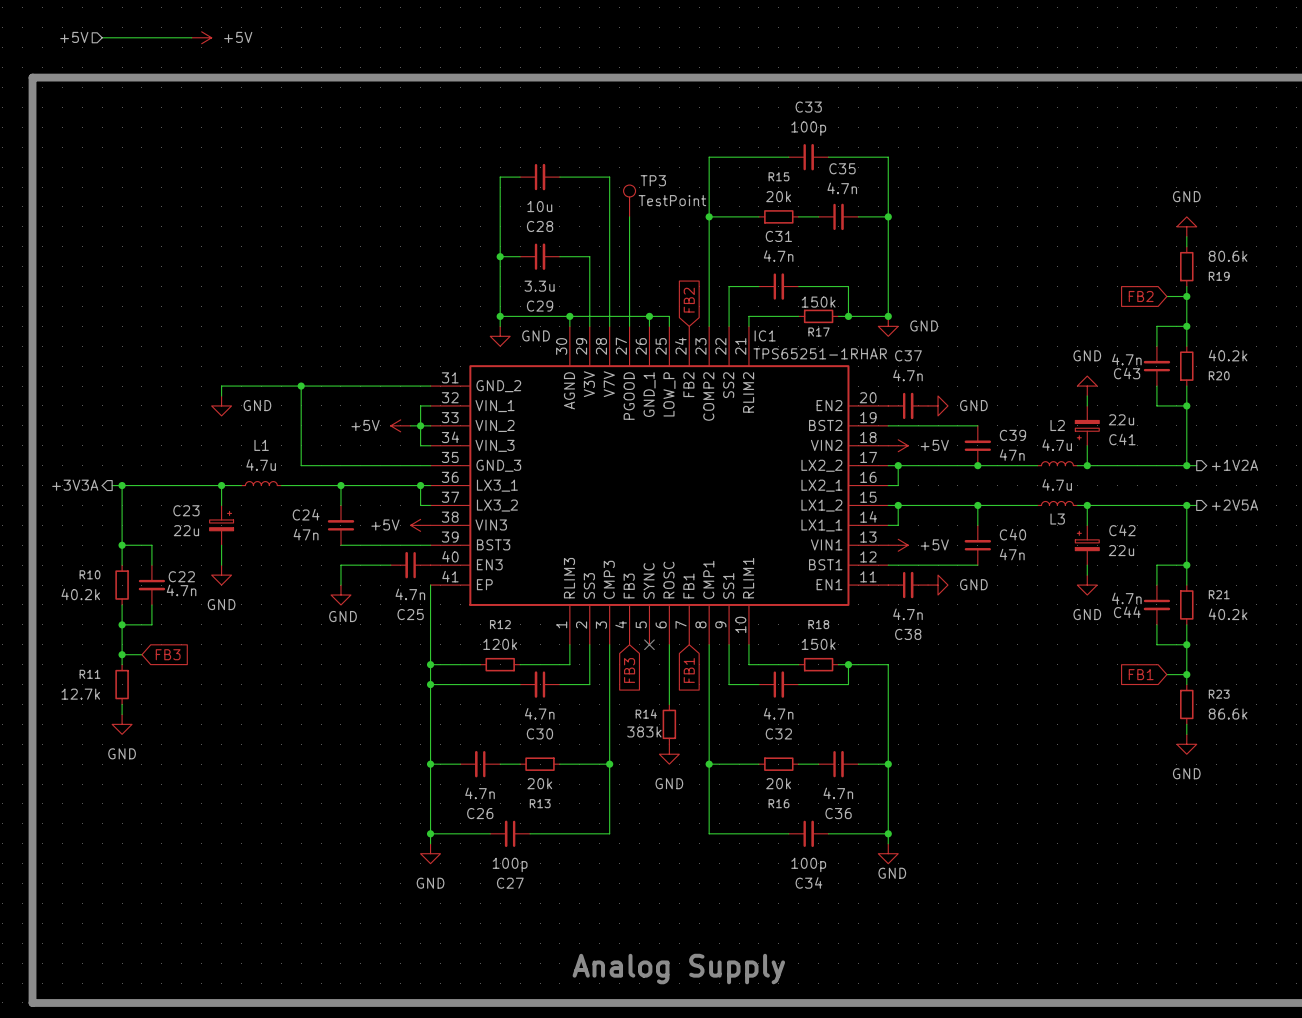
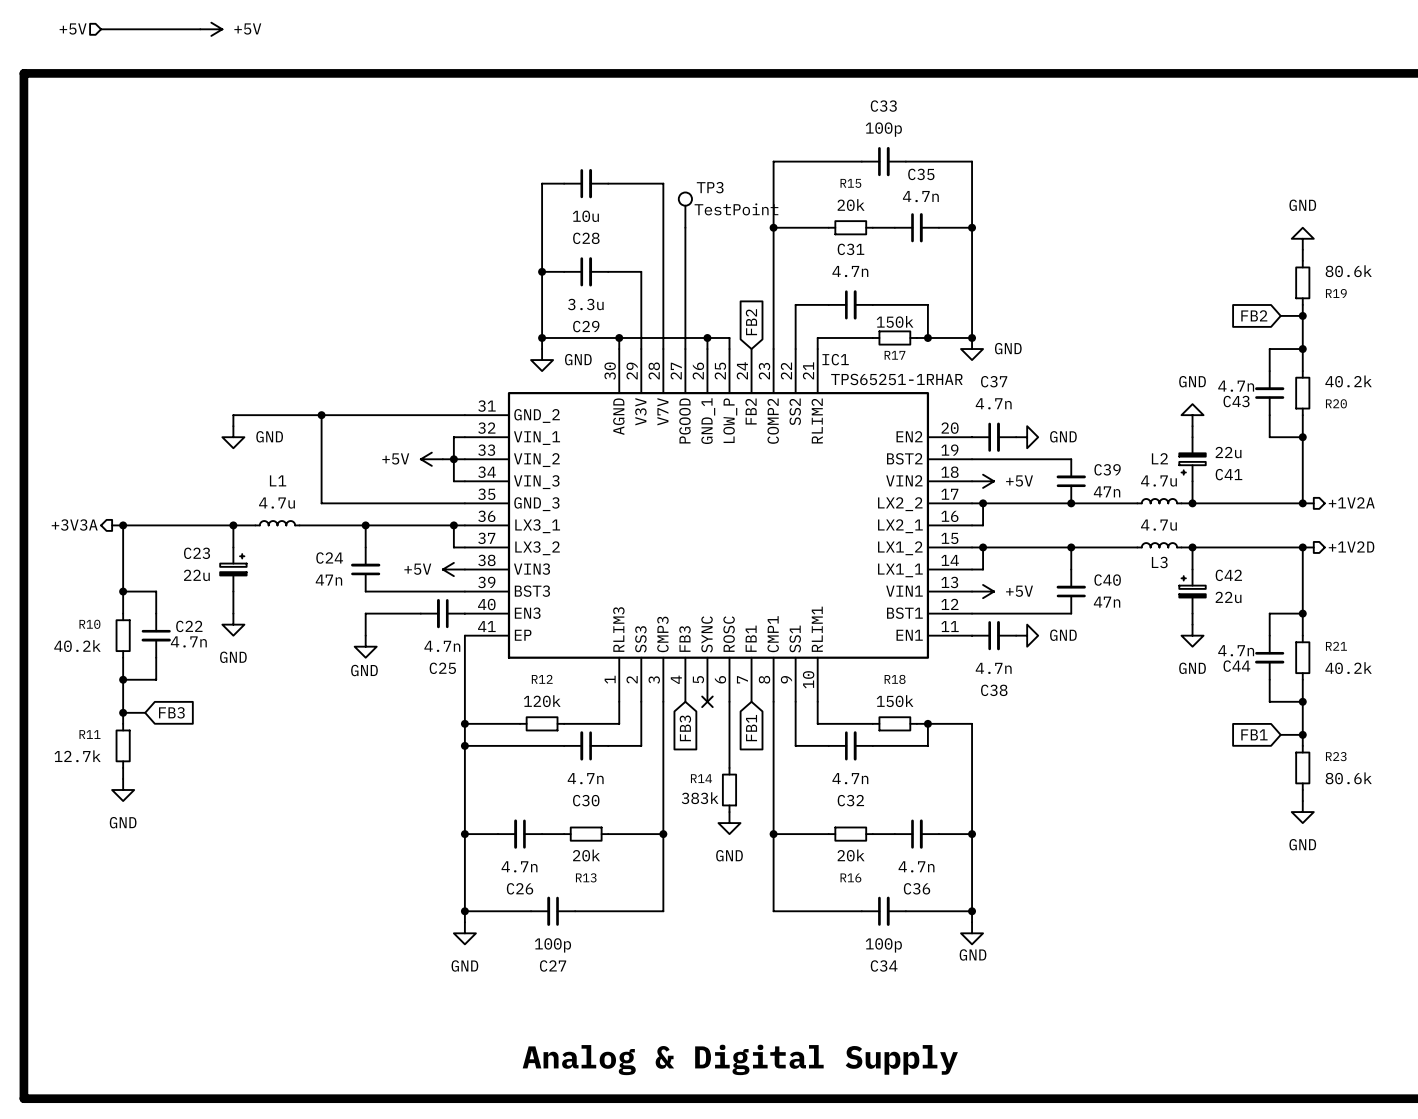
hierarchical label: +2V5A (1235, 505) -> +1V2D (1351, 546)
R23 value: 86.6k (1228, 714) -> 80.6k (1348, 778)
text: Analog Supply (678, 969) -> Analog & Digital Supply (740, 1059)

